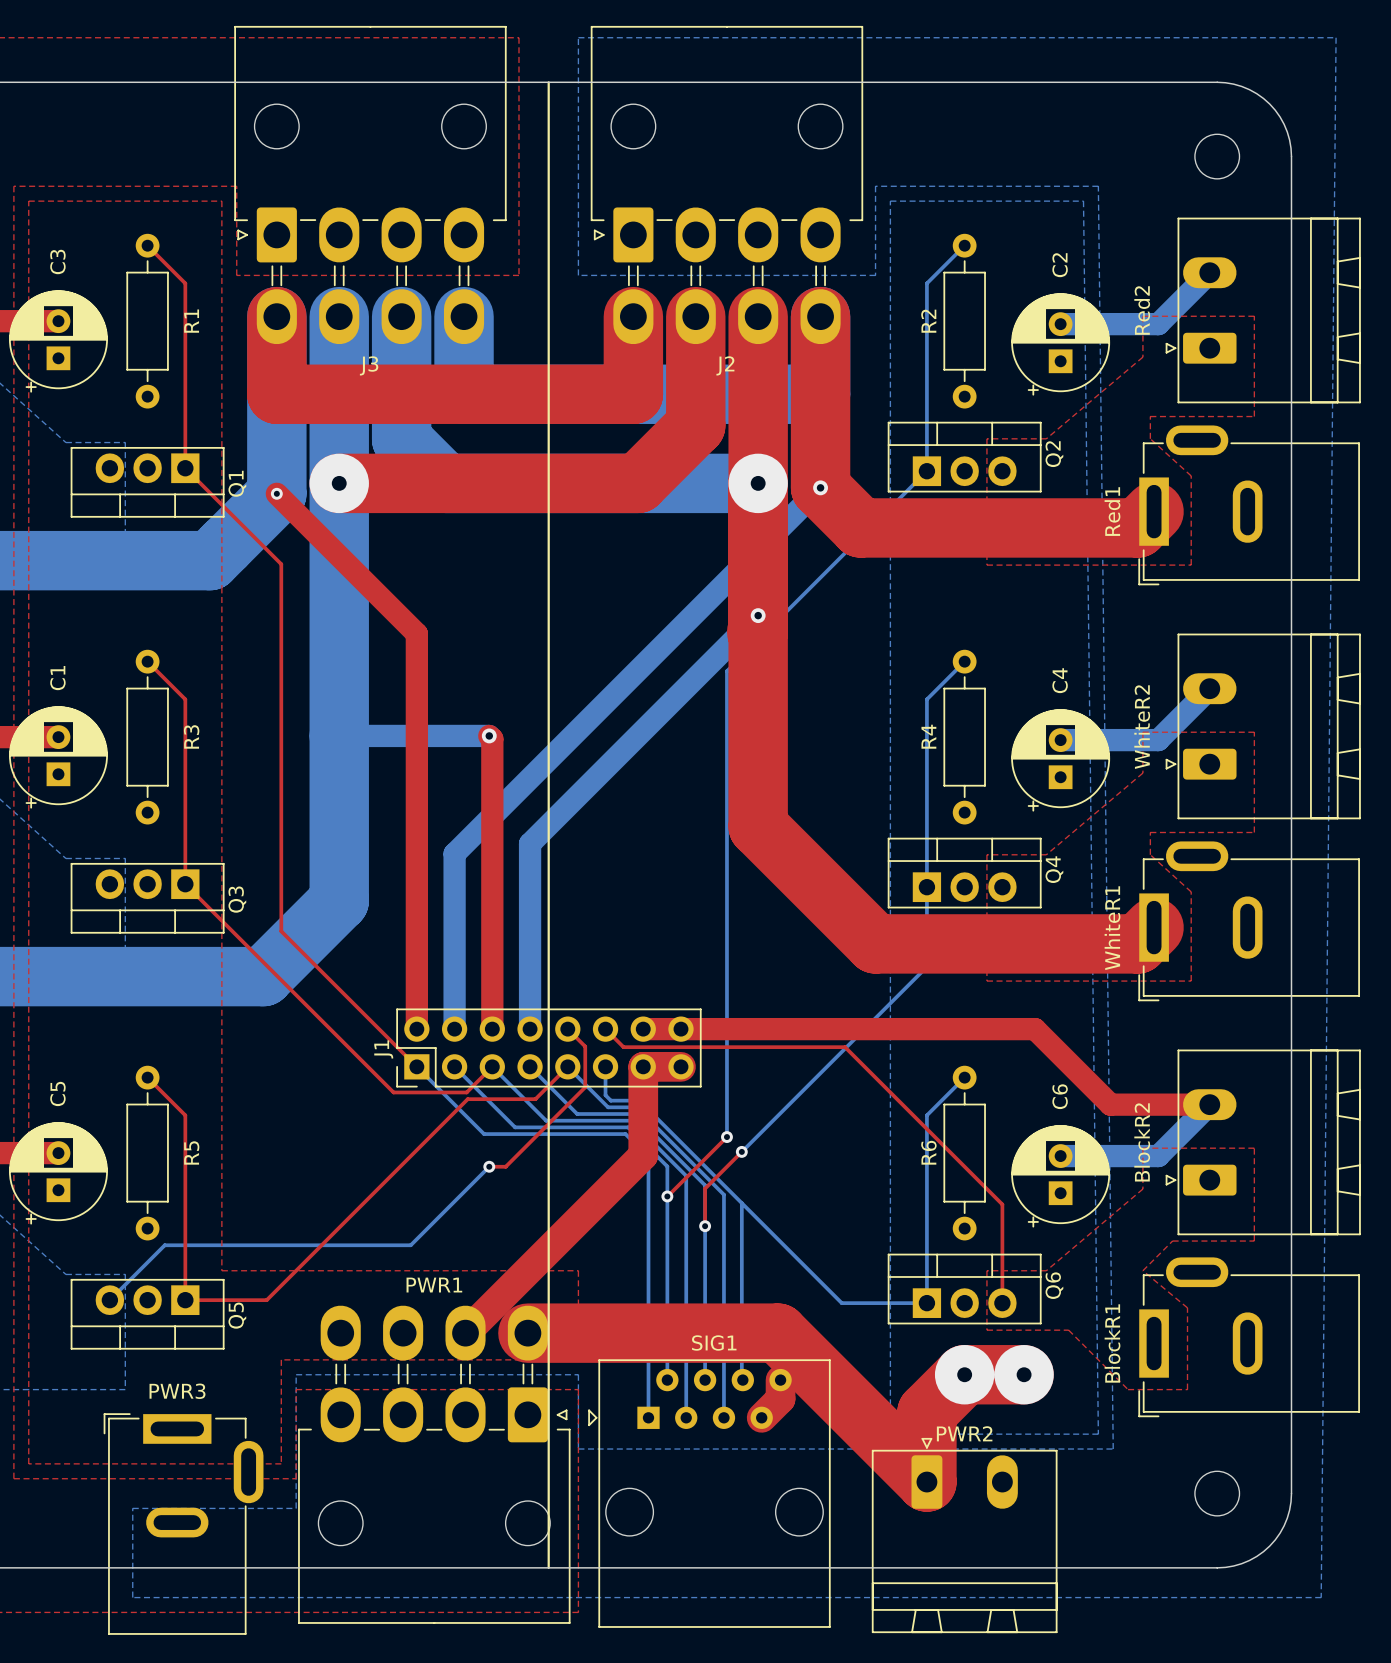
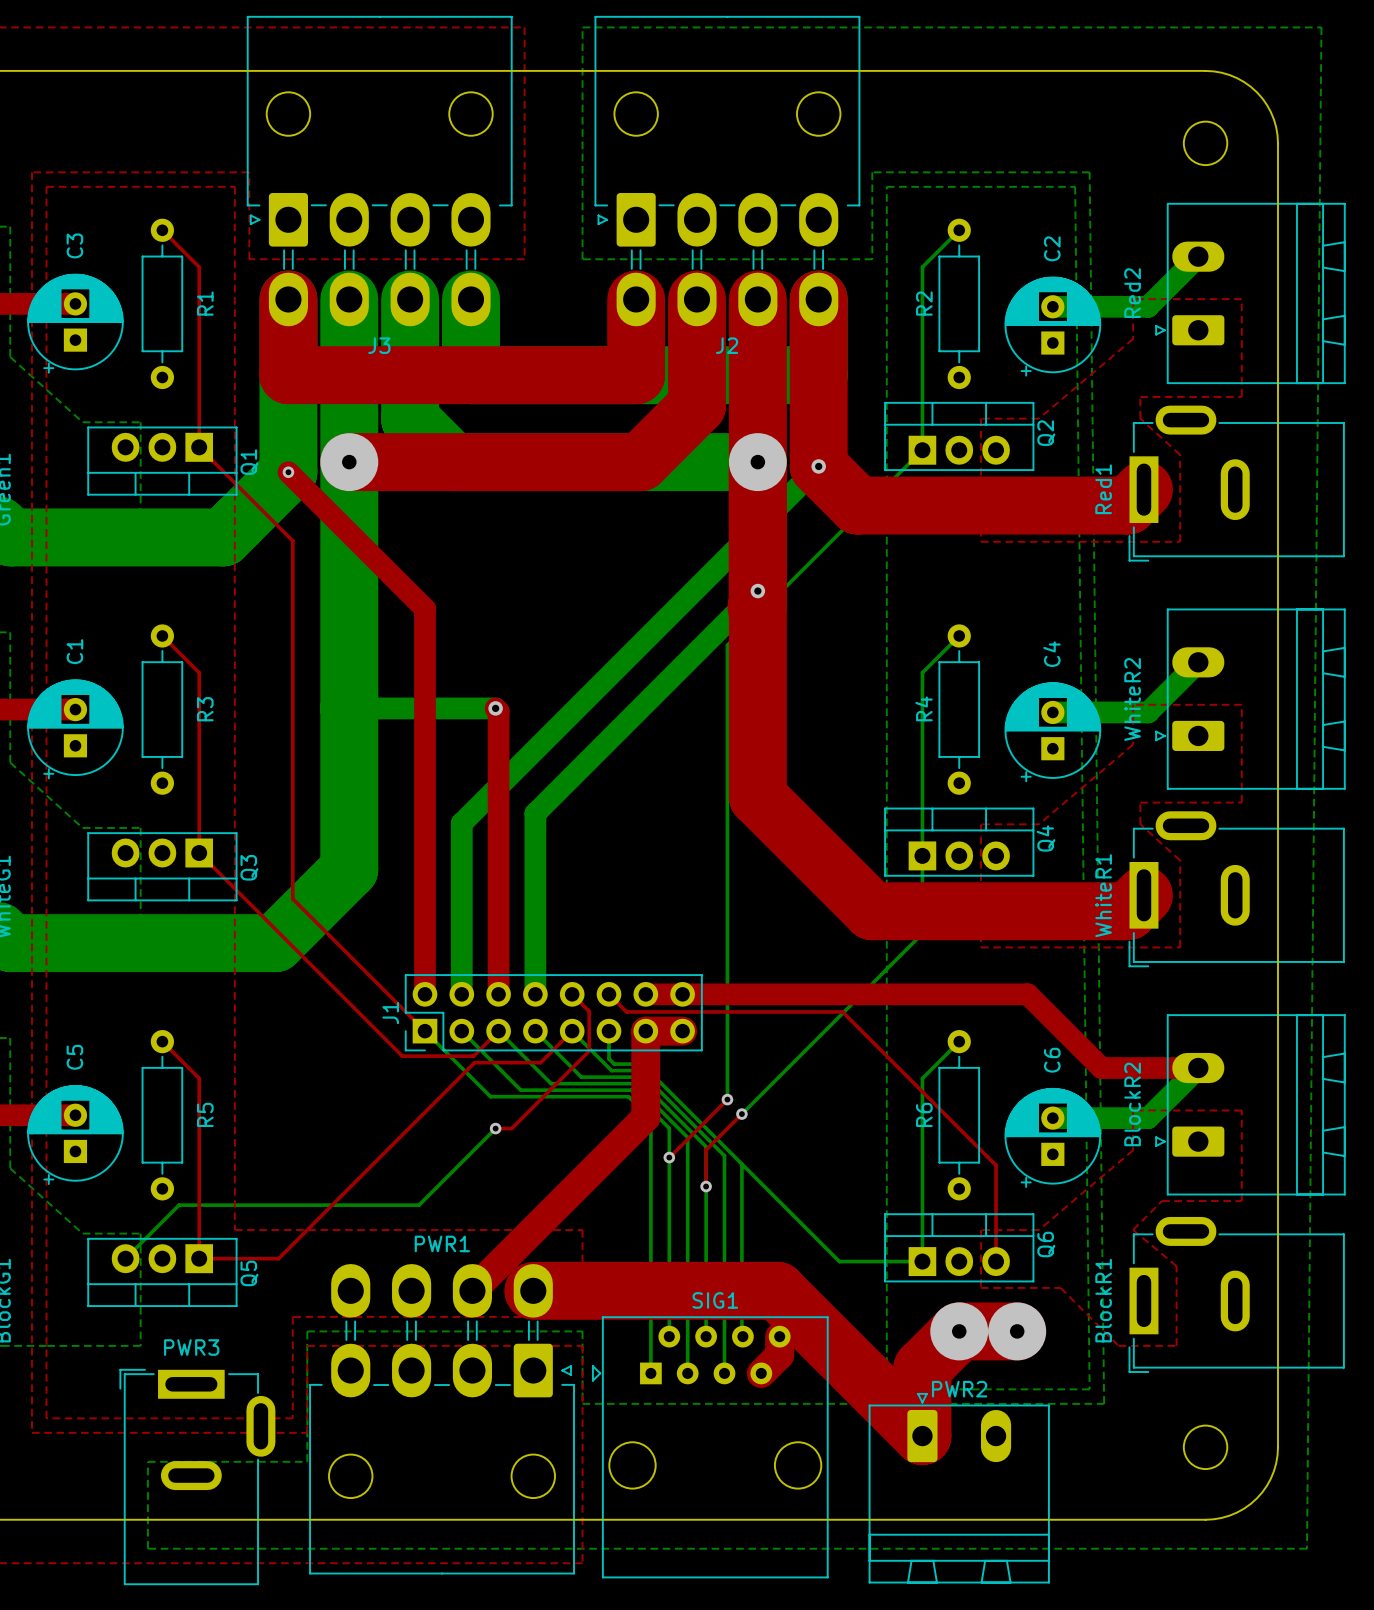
line: (548, 82) (548, 1567) -> none

